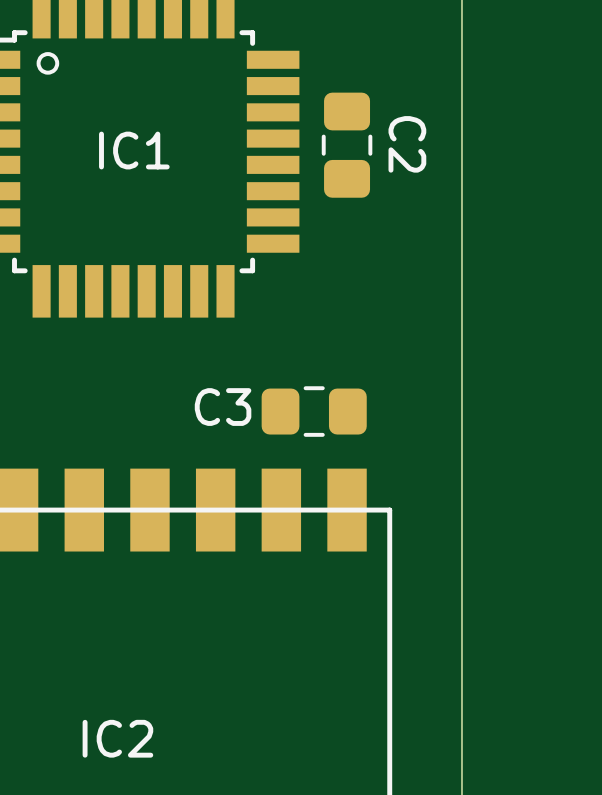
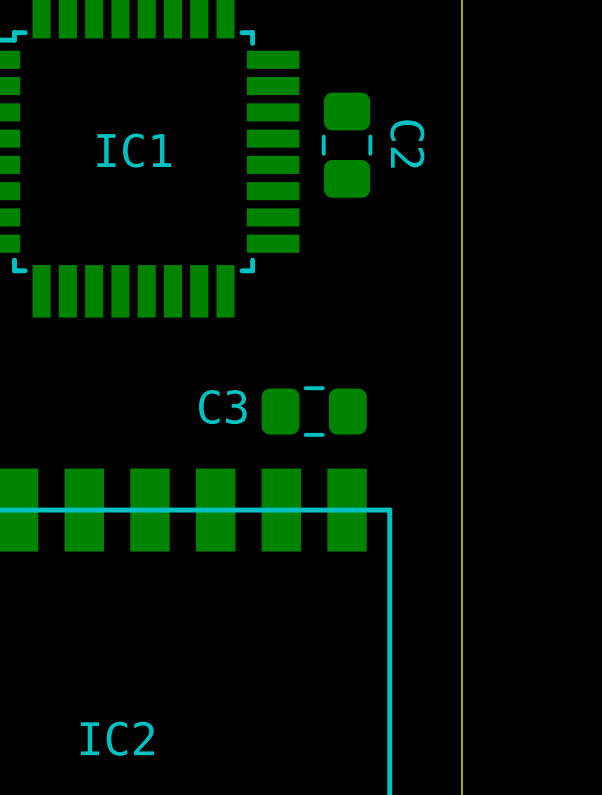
drawing: [36, 52, 60, 75] -> none

